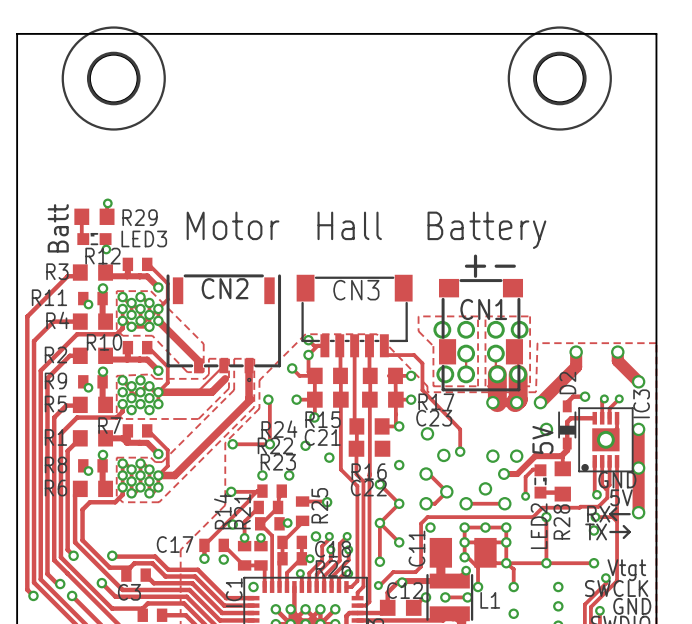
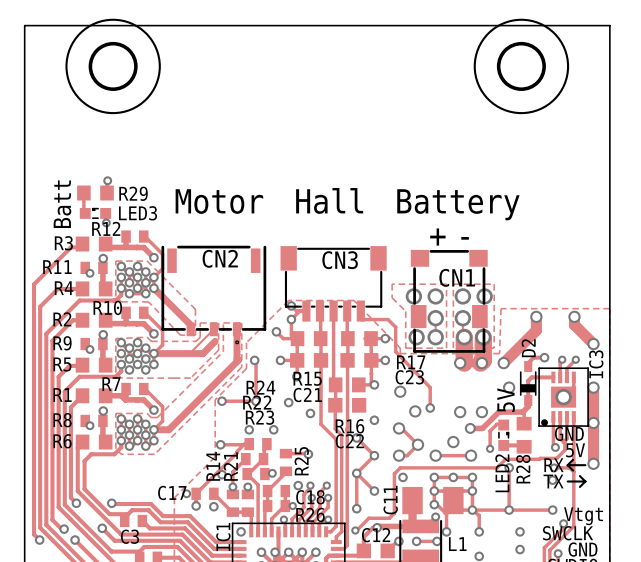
via: none -> (186, 493)

